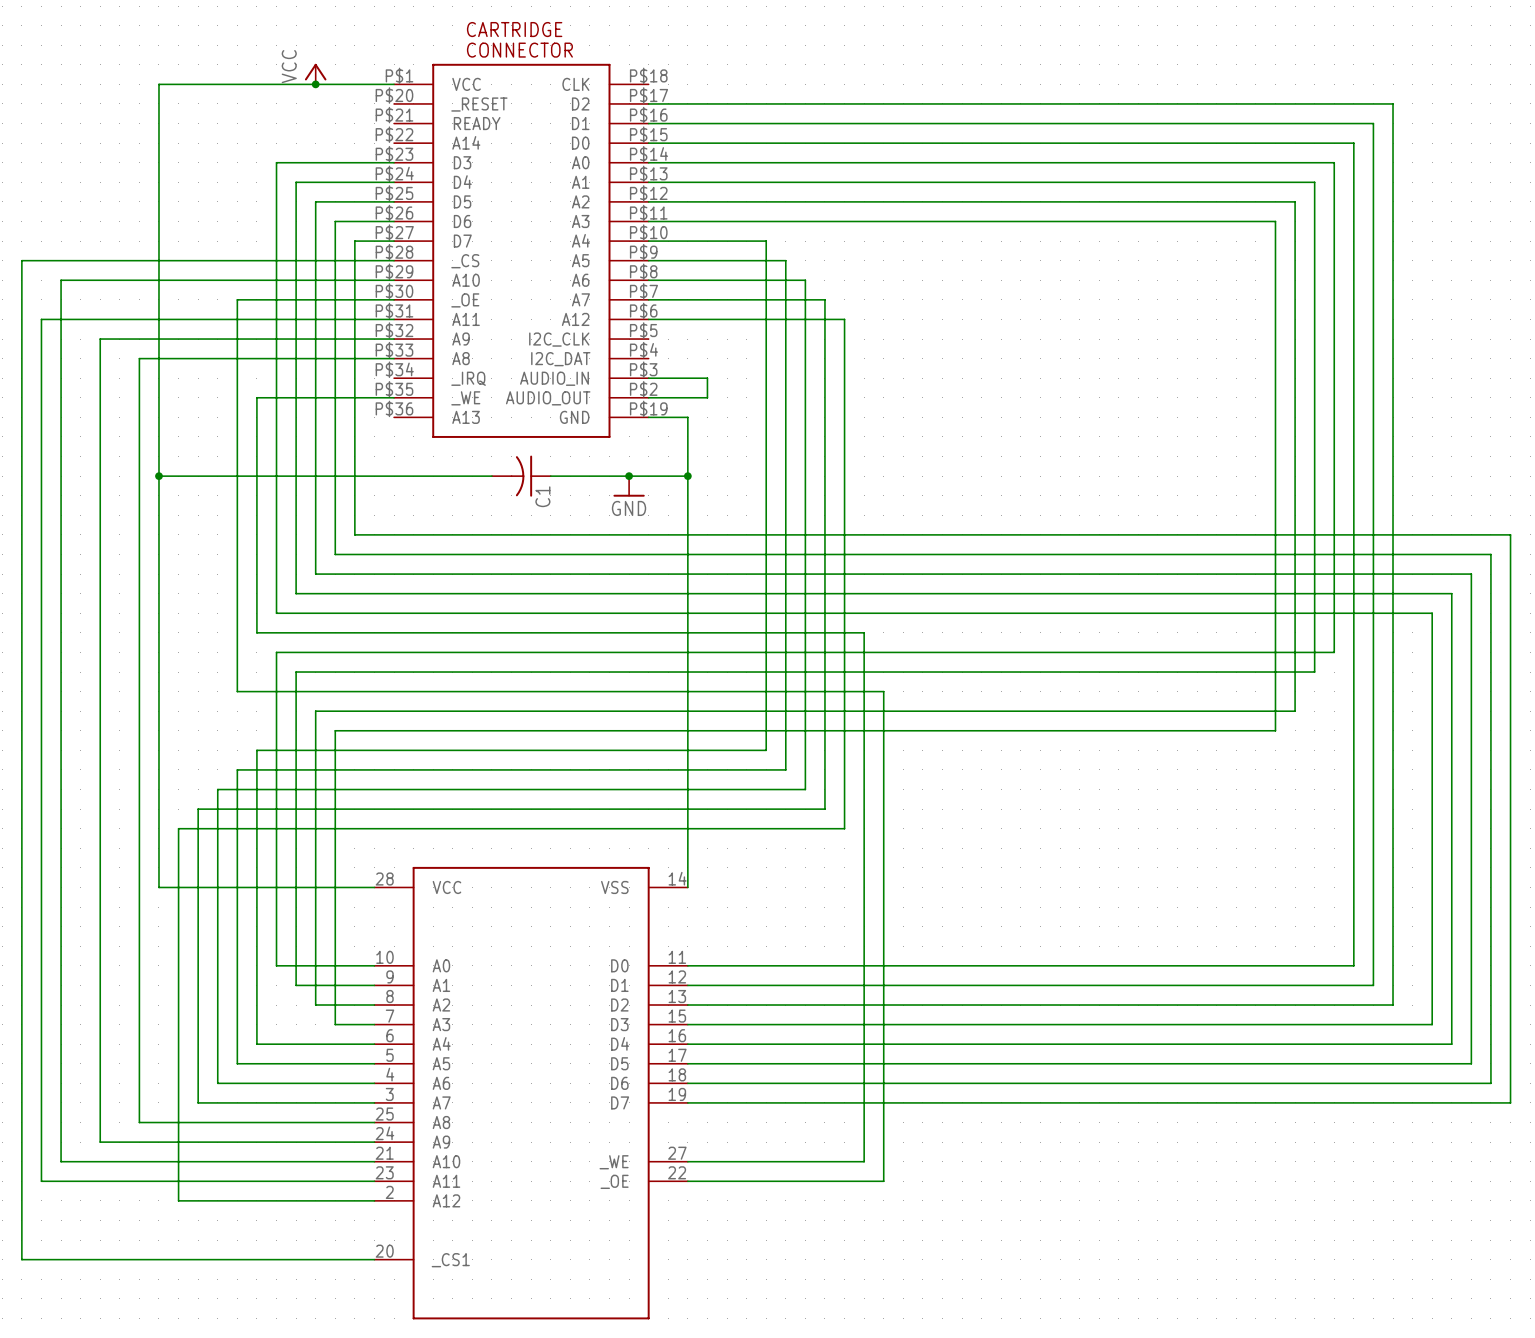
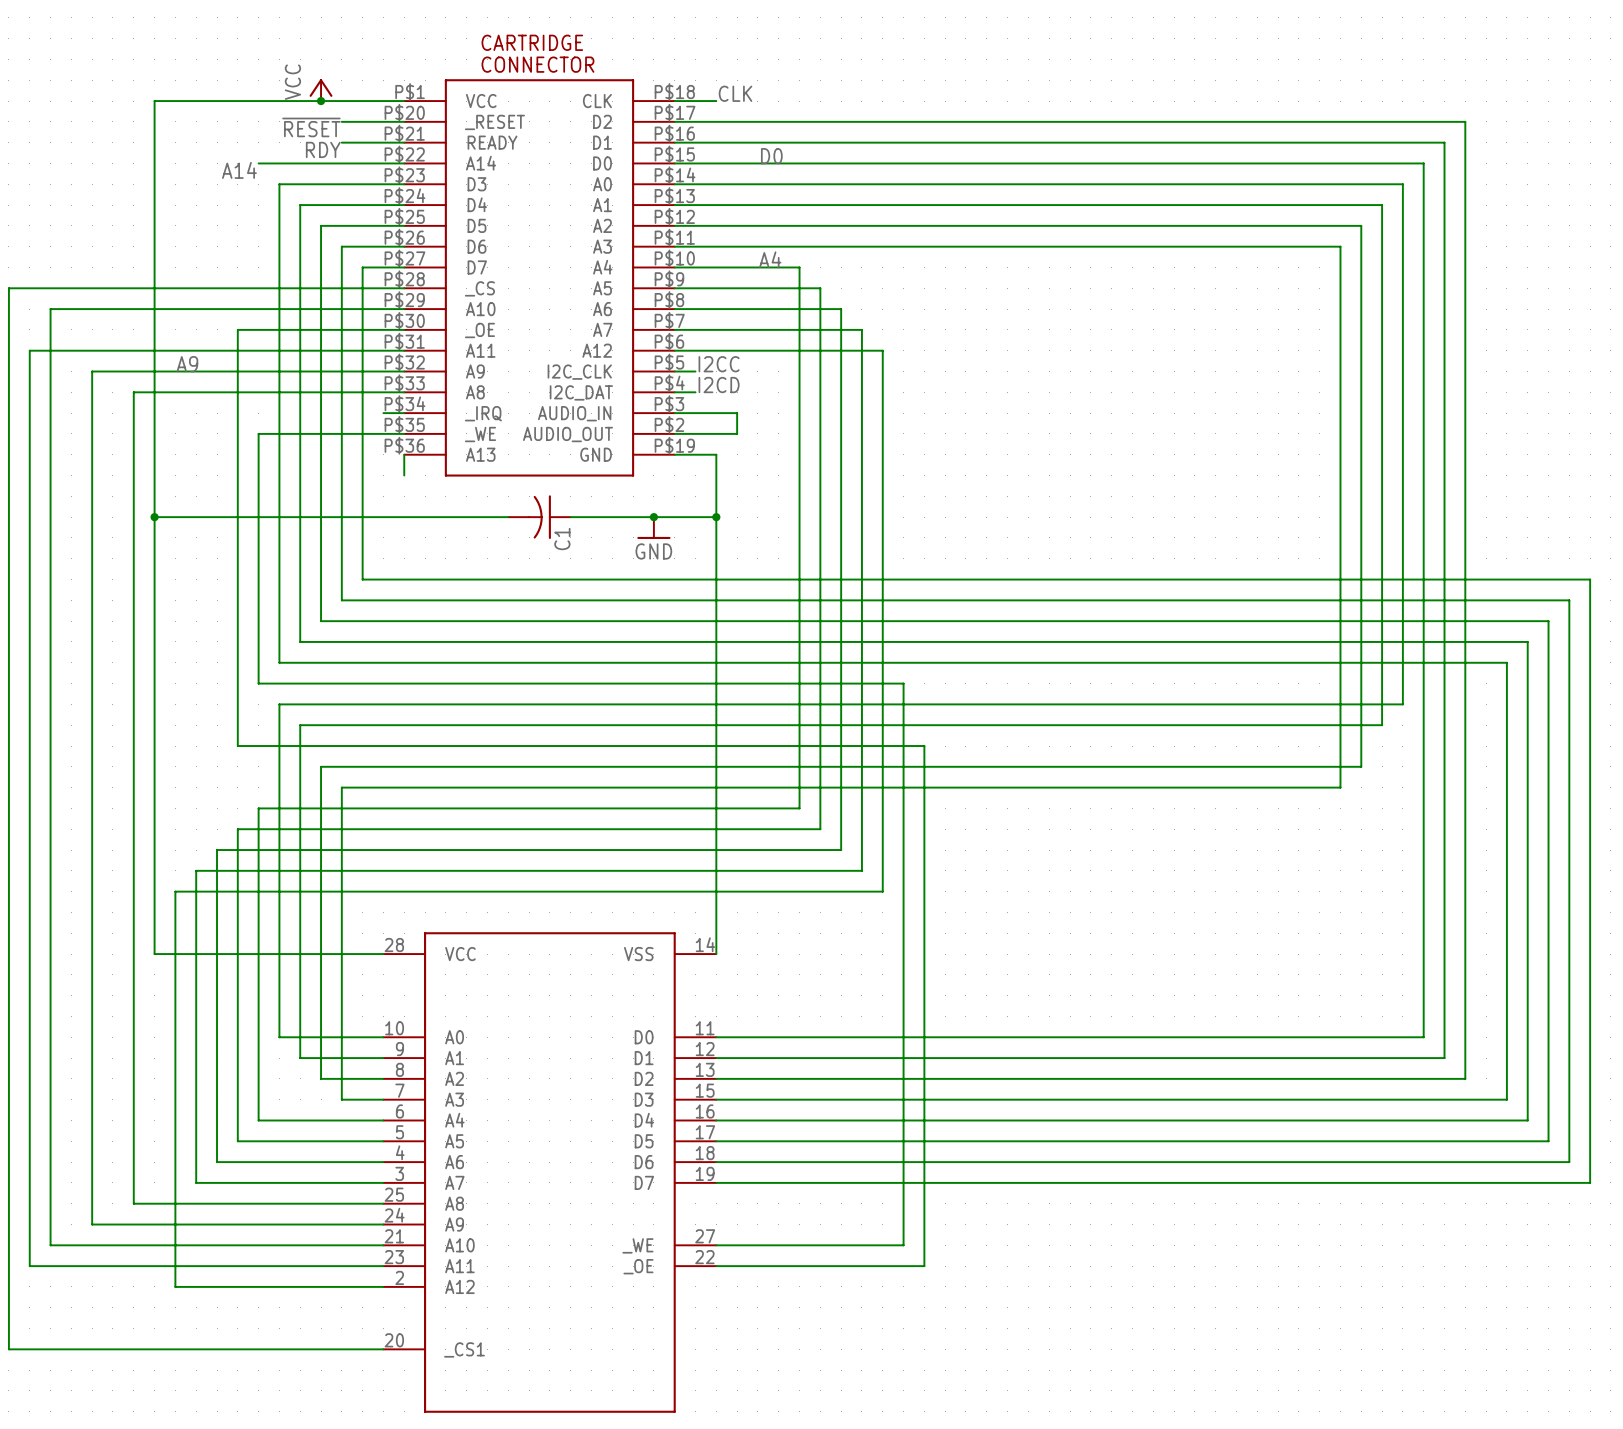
label: none -> CLK (735, 93)
wire: none -> (674, 101) (716, 101)
wire: none -> (341, 121) (404, 121)
label: none -> ~{RESET} (311, 127)
wire: none -> (341, 142) (404, 142)
label: none -> RDY (323, 149)
label: none -> D0 (771, 156)
wire: none -> (258, 163) (404, 163)
label: none -> A14 (239, 170)
label: none -> A4 (770, 259)
label: none -> A9 (187, 364)
label: none -> I2CC (719, 364)
wire: none -> (674, 371) (695, 371)
label: none -> I2CD (719, 385)
wire: none -> (674, 392) (695, 392)
wire: none -> (383, 413) (404, 413)
wire: none -> (404, 454) (404, 475)

